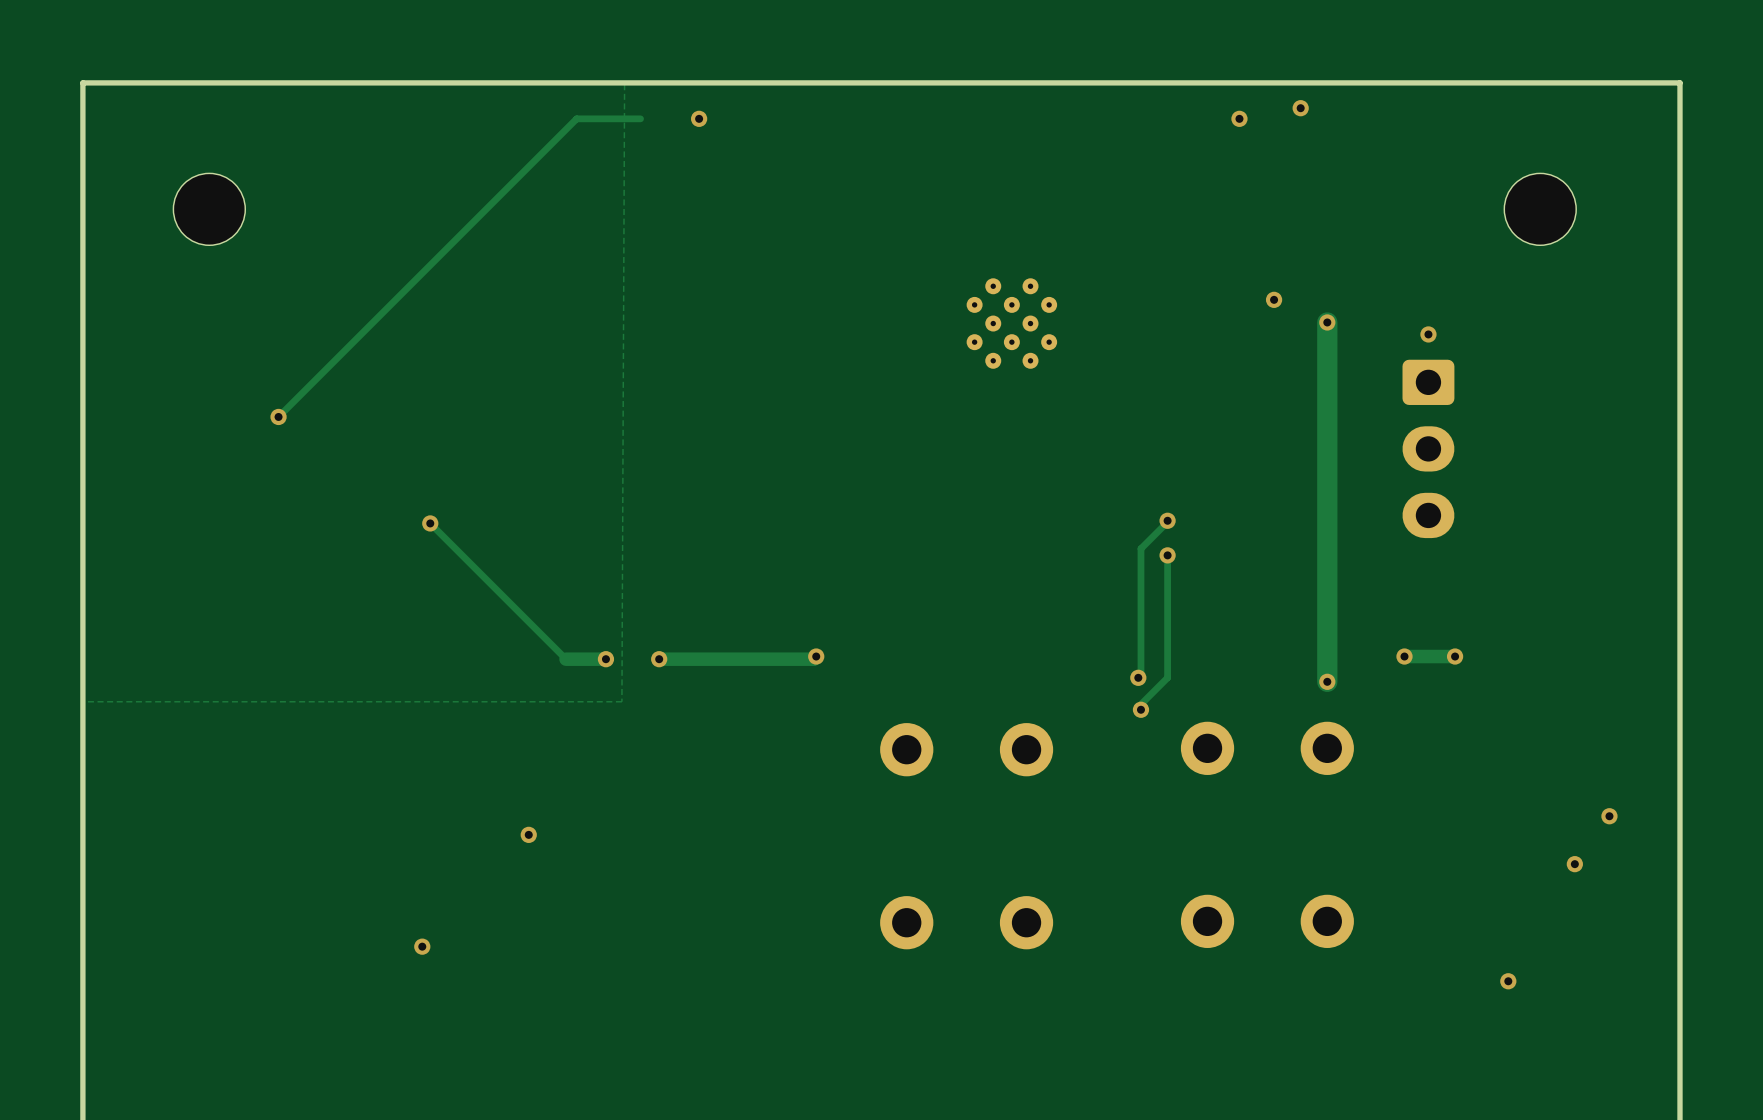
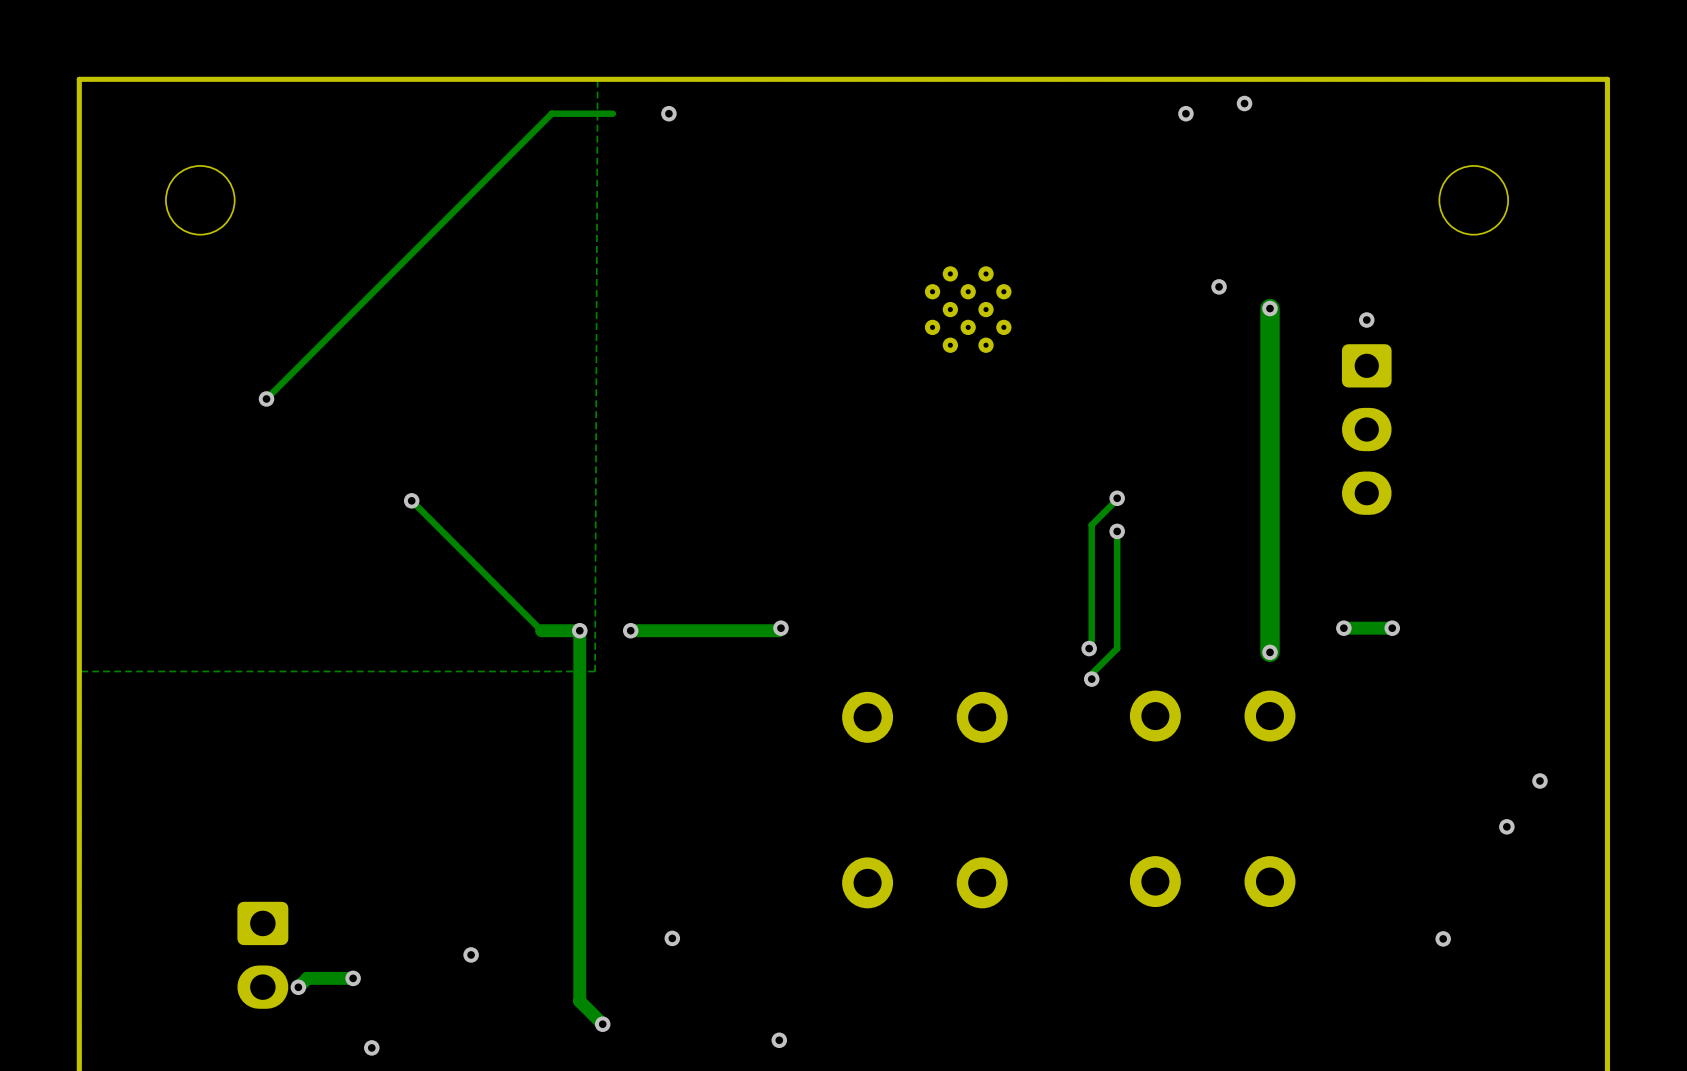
track: none -> (579, 630) (579, 1001) (602, 1024)
via: (528, 834) -> none
via: (422, 946) -> none
via: none -> (672, 938)
part: none -> (262, 955)
via: none -> (471, 954)
track: none -> (353, 978) (307, 978) (298, 987)
via: none -> (353, 978)
via: none -> (298, 987)
via: none -> (602, 1024)
via: none -> (779, 1040)
via: none -> (371, 1047)

